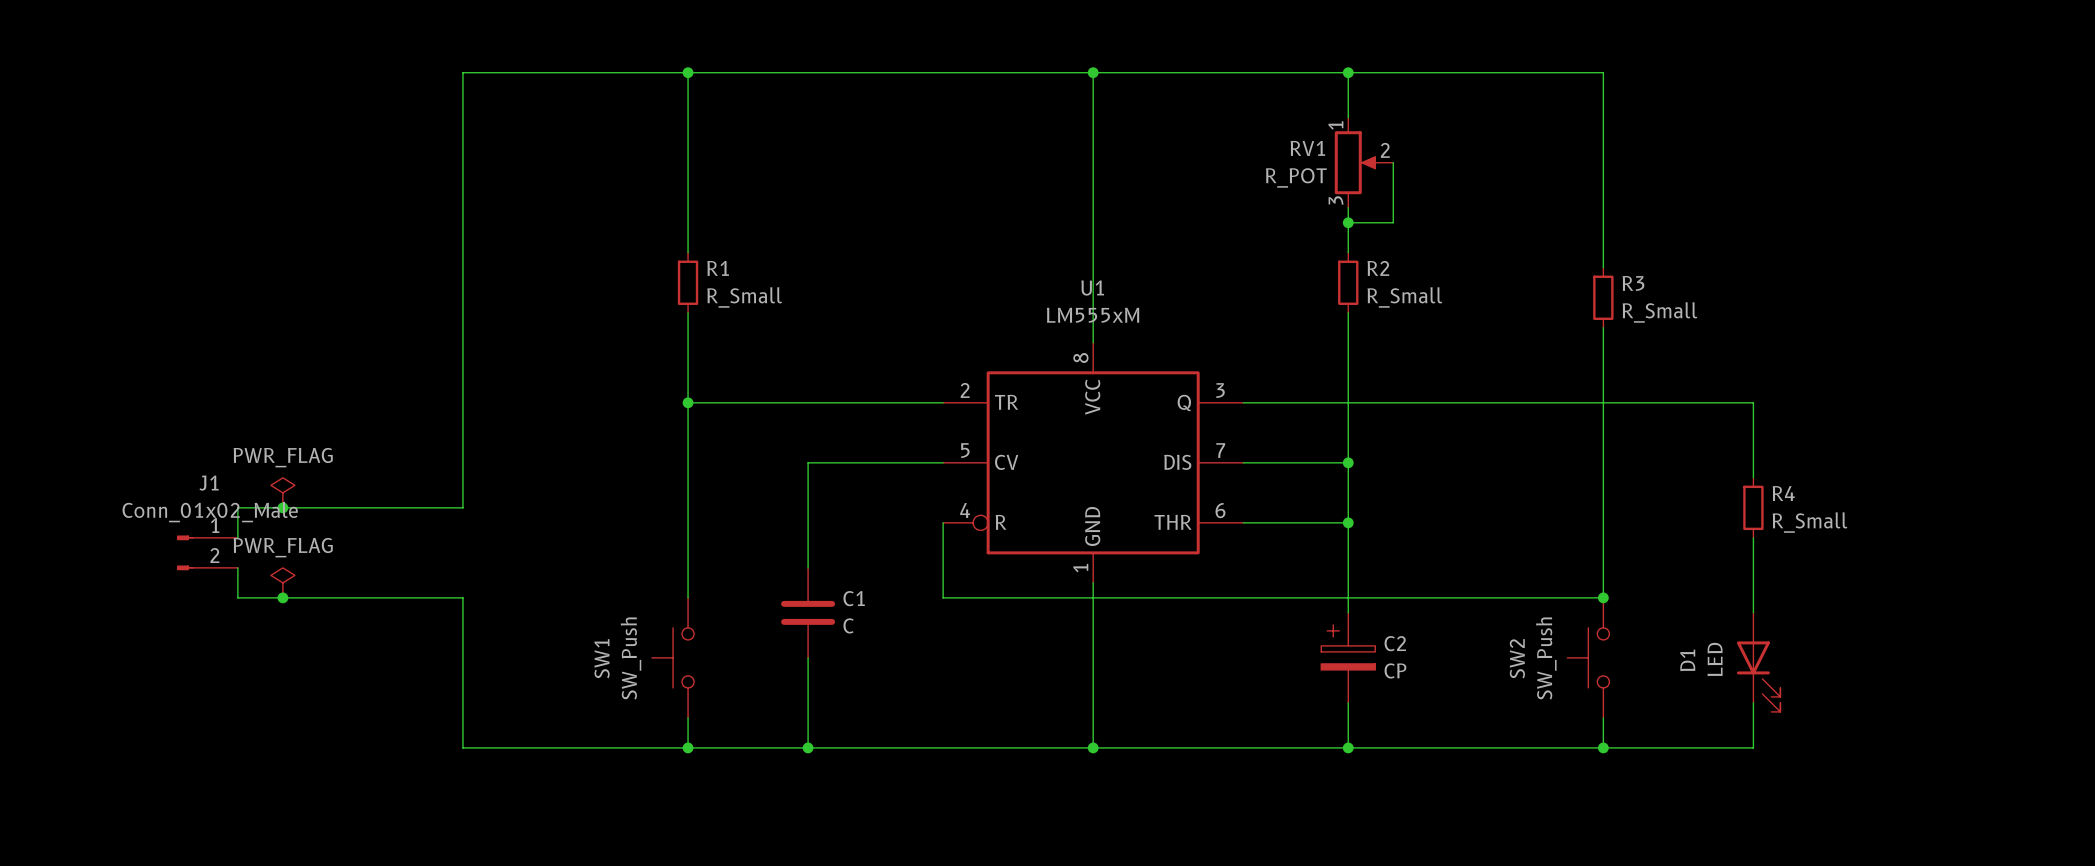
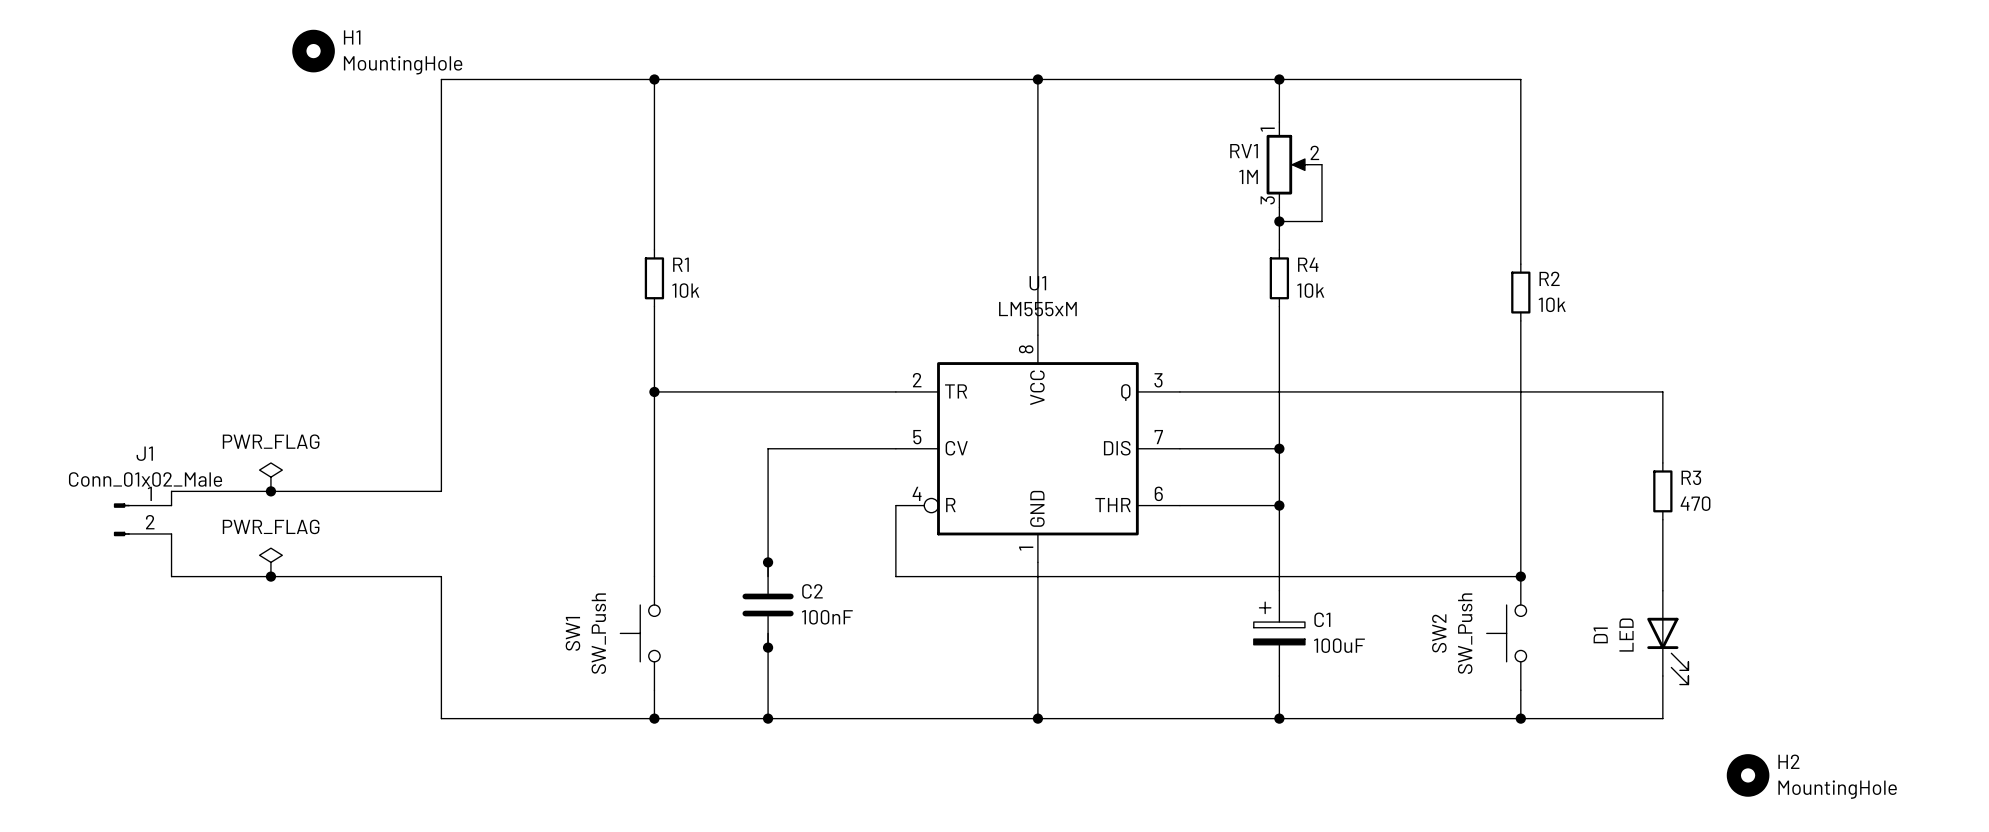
H1: none -> MountingHole (313, 51)
RV1 value: R_POT (1296, 177) -> 1M (1248, 176)
R2 name: R2 (1378, 268) -> R4 (1308, 264)
R3 name: R3 (1633, 283) -> R2 (1549, 278)
R1 value: R_Small (744, 297) -> 10k (685, 290)
R2 value: R_Small (1404, 297) -> 10k (1310, 290)
R3 value: R_Small (1659, 312) -> 10k (1552, 304)
R4 name: R4 (1783, 493) -> R3 (1691, 477)
wire: (237, 507) (237, 537) -> (228, 491) (171, 491) (171, 505)
R4 value: R_Small (1809, 522) -> 470 (1695, 503)
J1 position: (207, 552) -> (142, 519)
wire: (237, 567) (237, 597) -> (171, 533) (171, 576) (228, 576)
junction: none -> (768, 562)
C1: C (808, 612) -> none
C2: none -> 100nF (768, 605)
C2 name: C2 (1395, 643) -> C1 (1322, 619)
C2 value: CP (1395, 670) -> 100uF (1339, 645)
junction: none -> (768, 647)
H2: none -> MountingHole (1748, 775)

